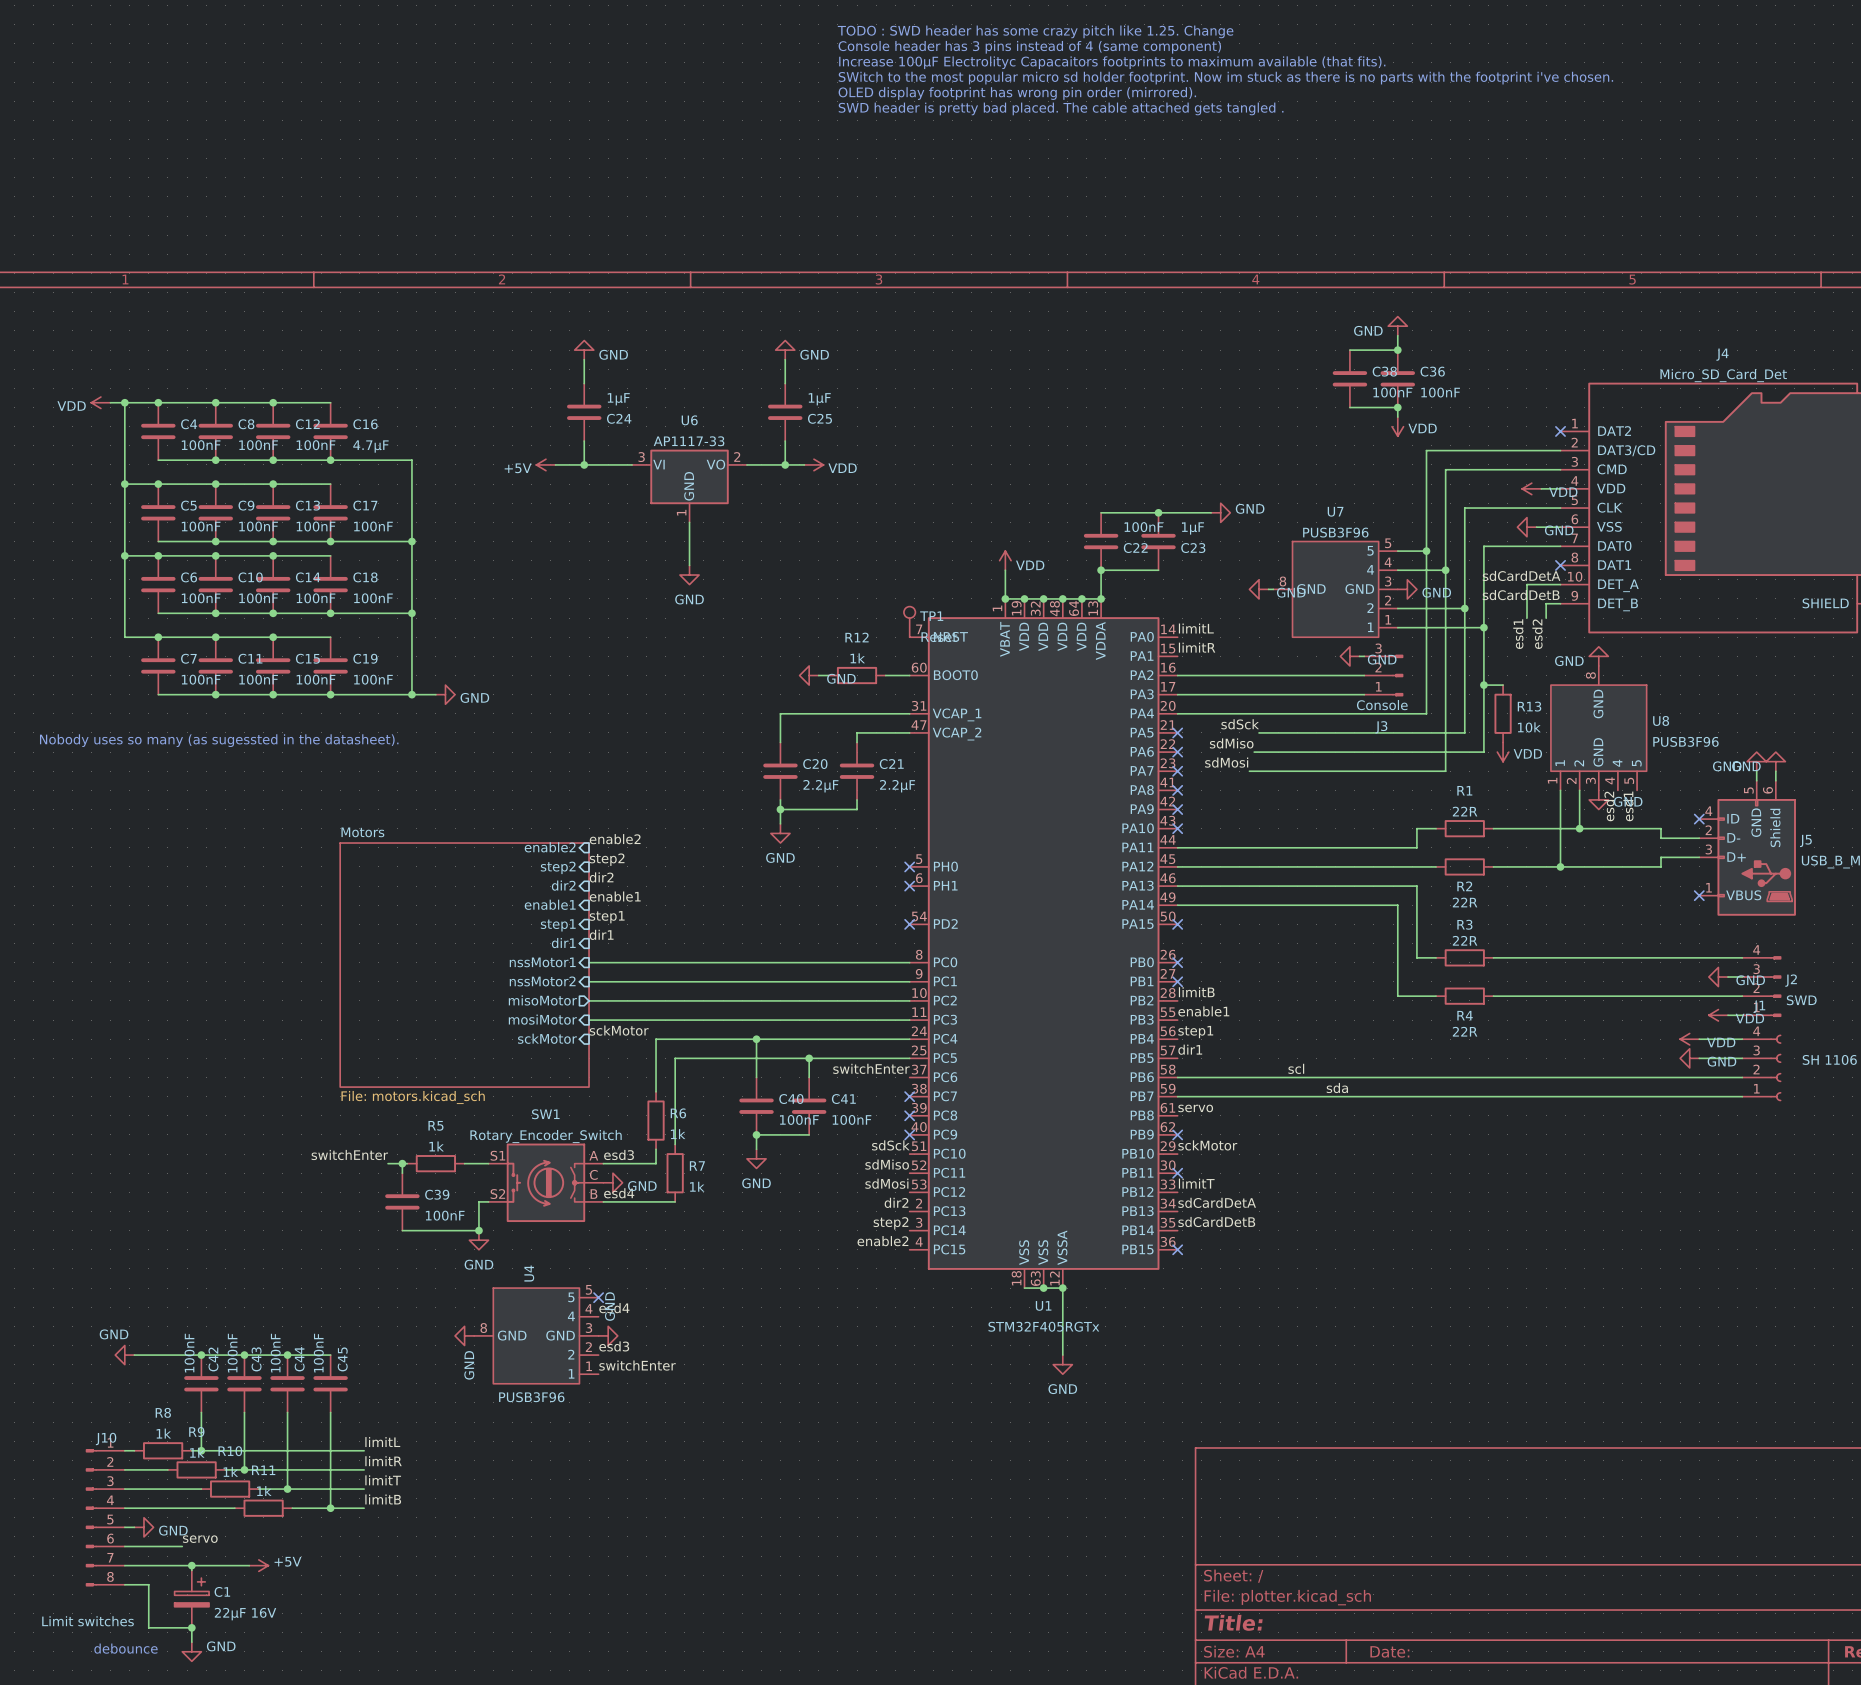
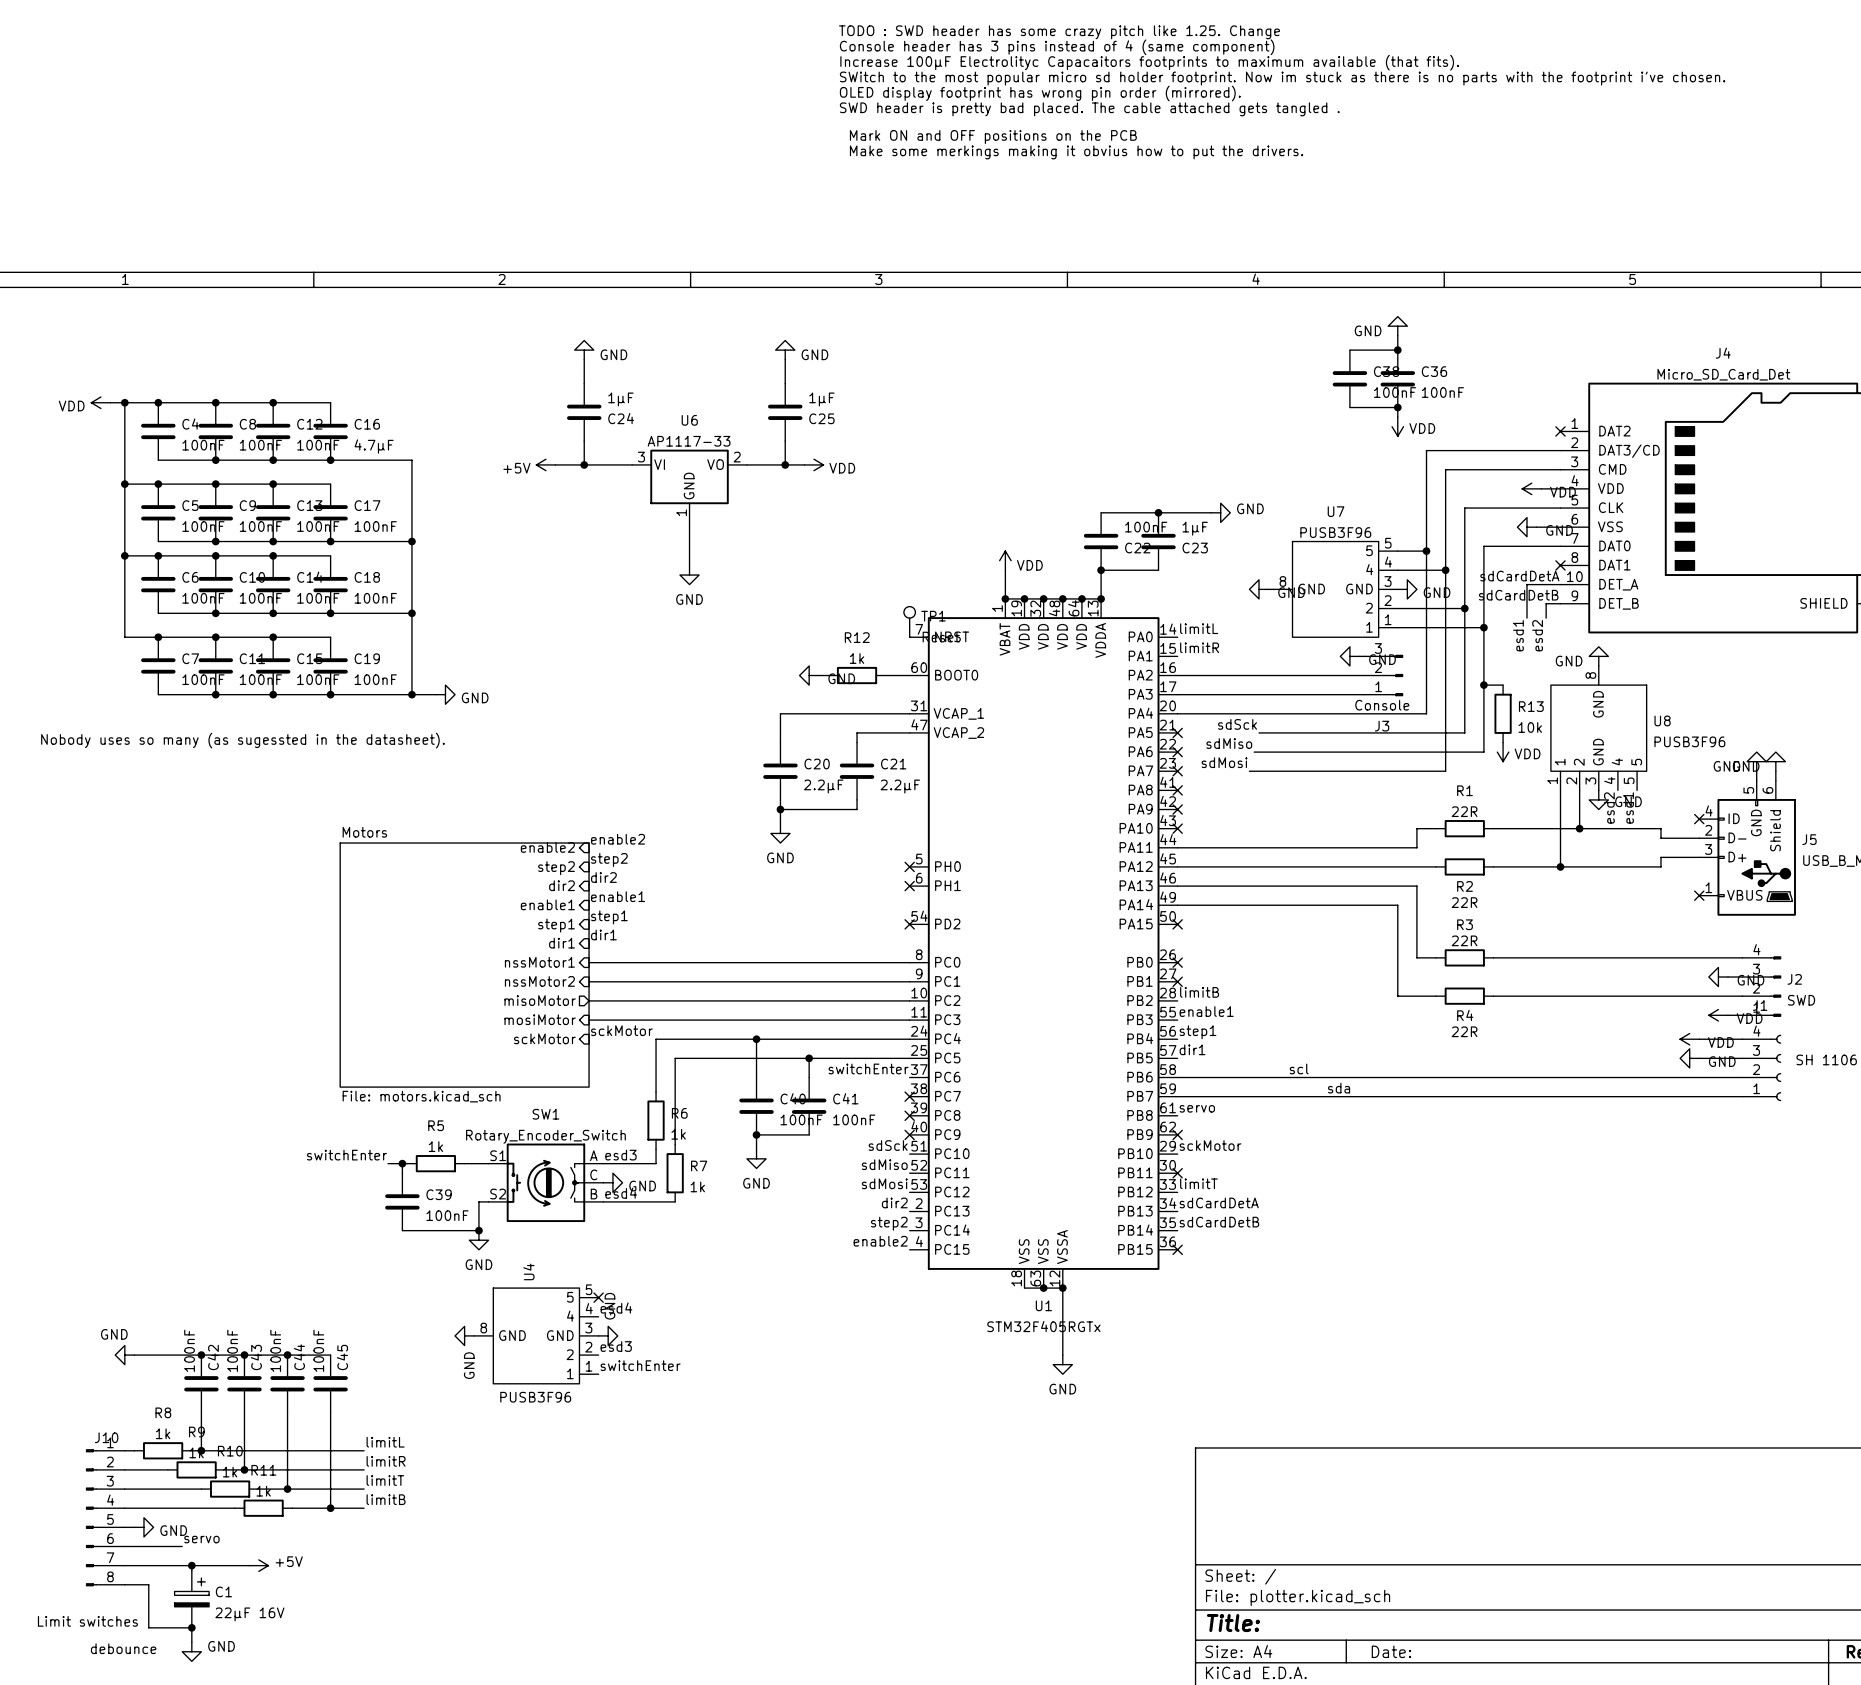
text: none -> Mark ON and OFF positions on the PCB (993, 137)
text: none -> Make some merkings making it obvius how to put the drivers. (1076, 152)

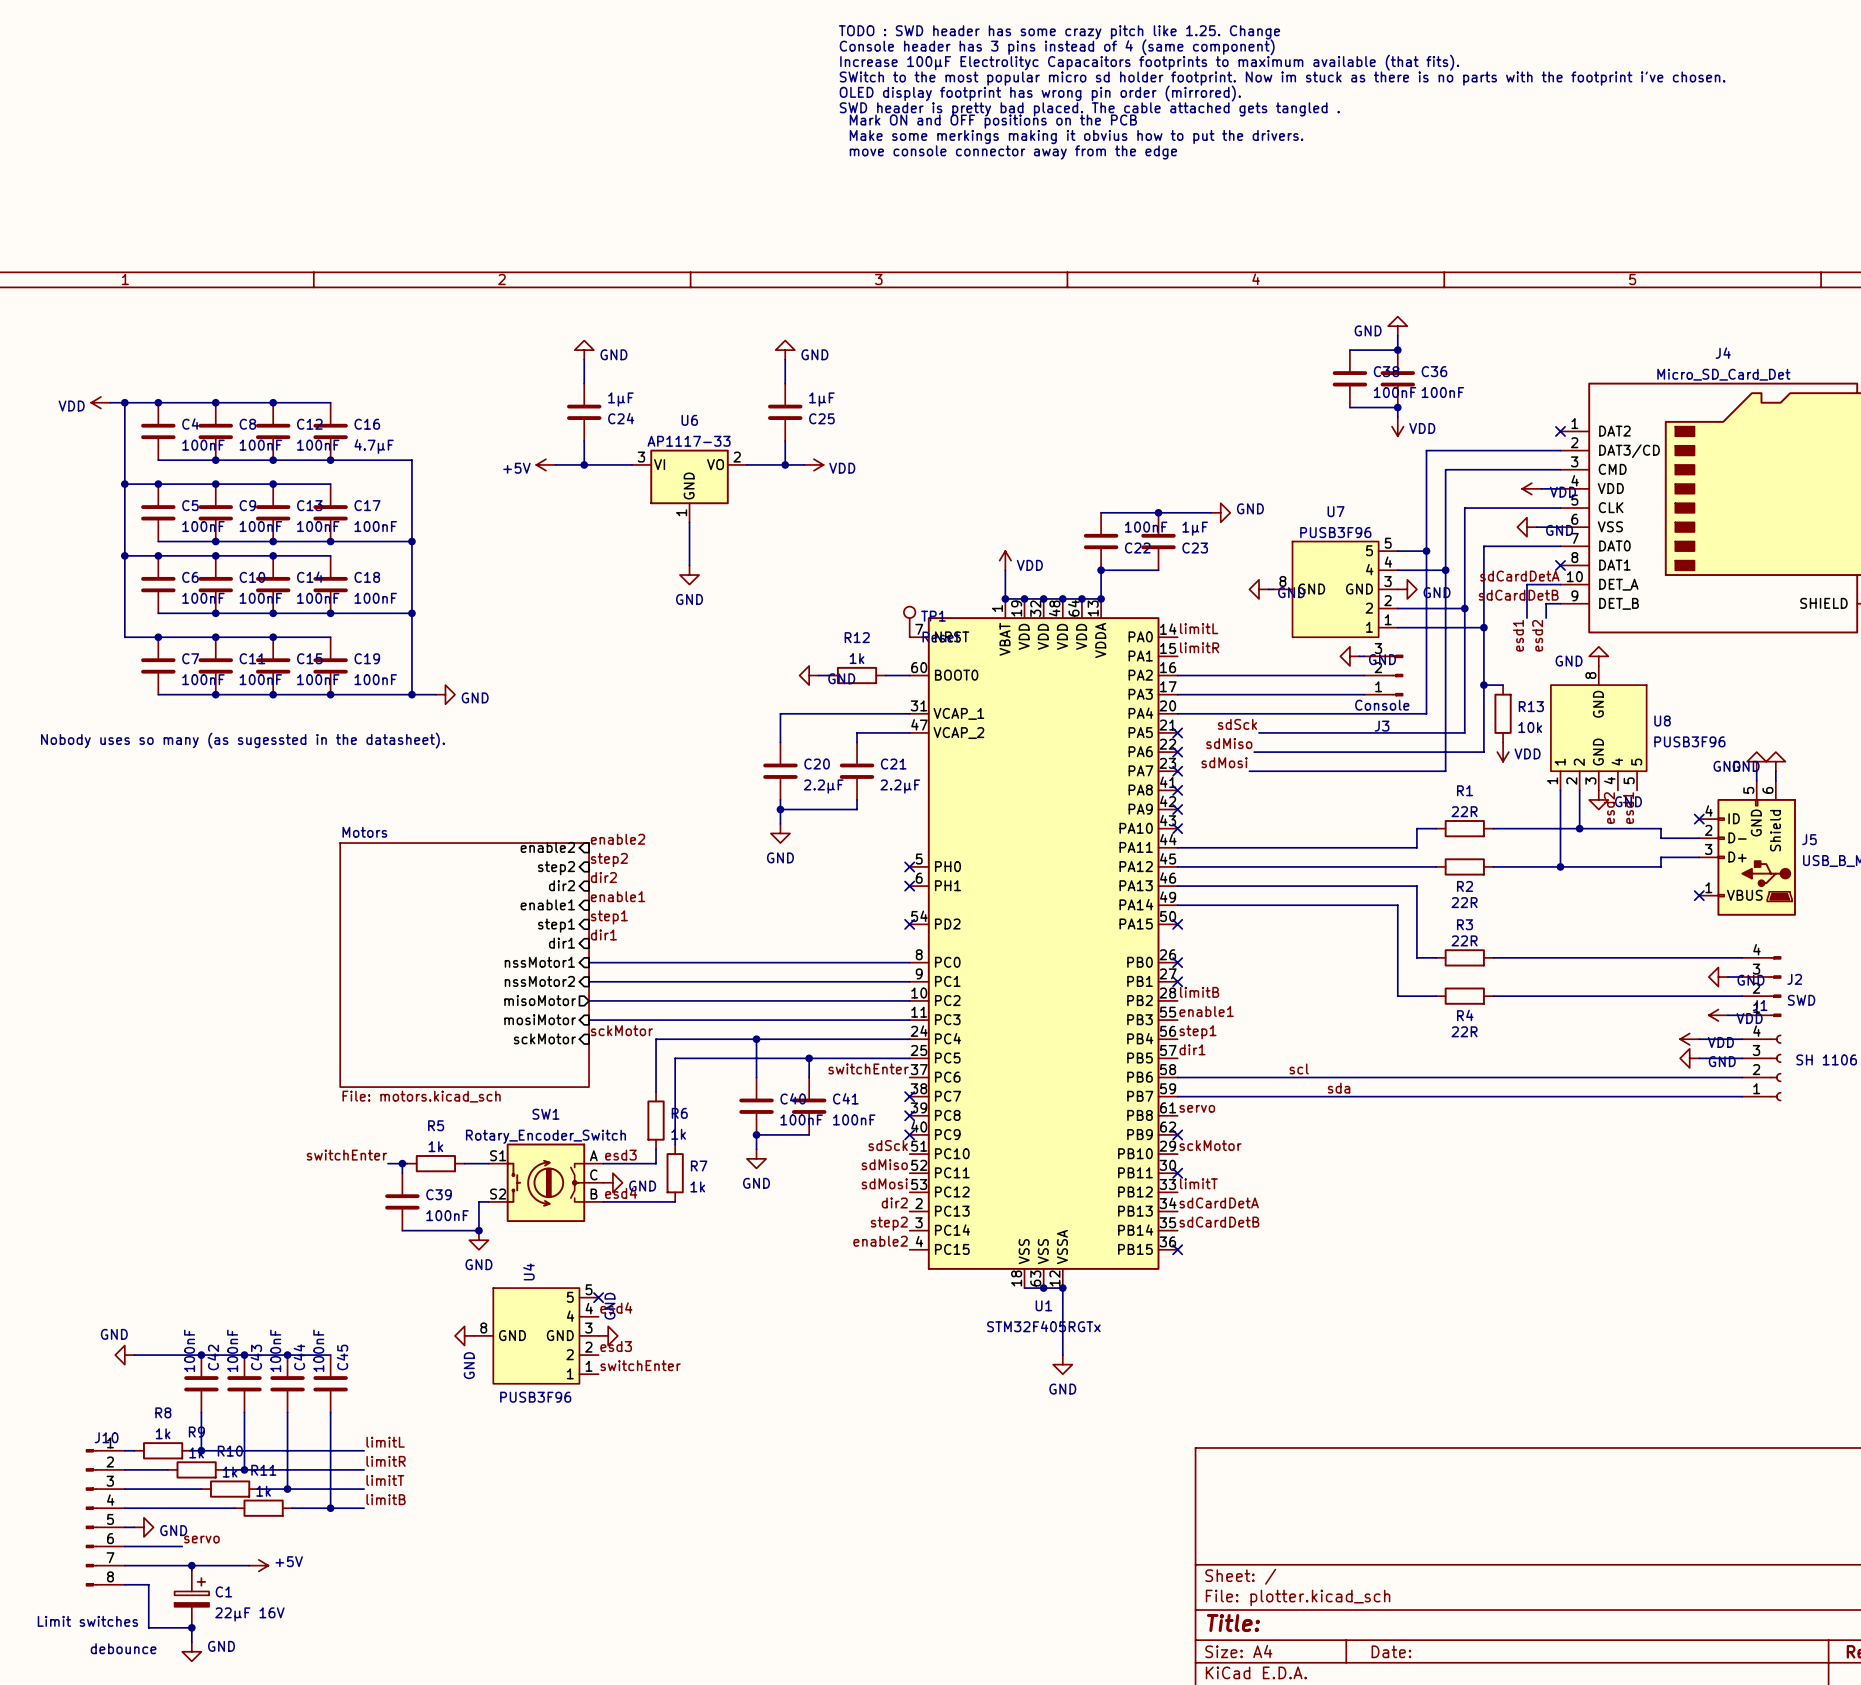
text: none -> Mark ON and OFF positions on the PCB (993, 121)
text: Mark ON and OFF positions on the PCB (993, 137) -> Make some merkings making it obvius how to put the drivers. (1076, 137)
text: Make some merkings making it obvius how to put the drivers. (1076, 152) -> move console connector away from the edge (1013, 152)

